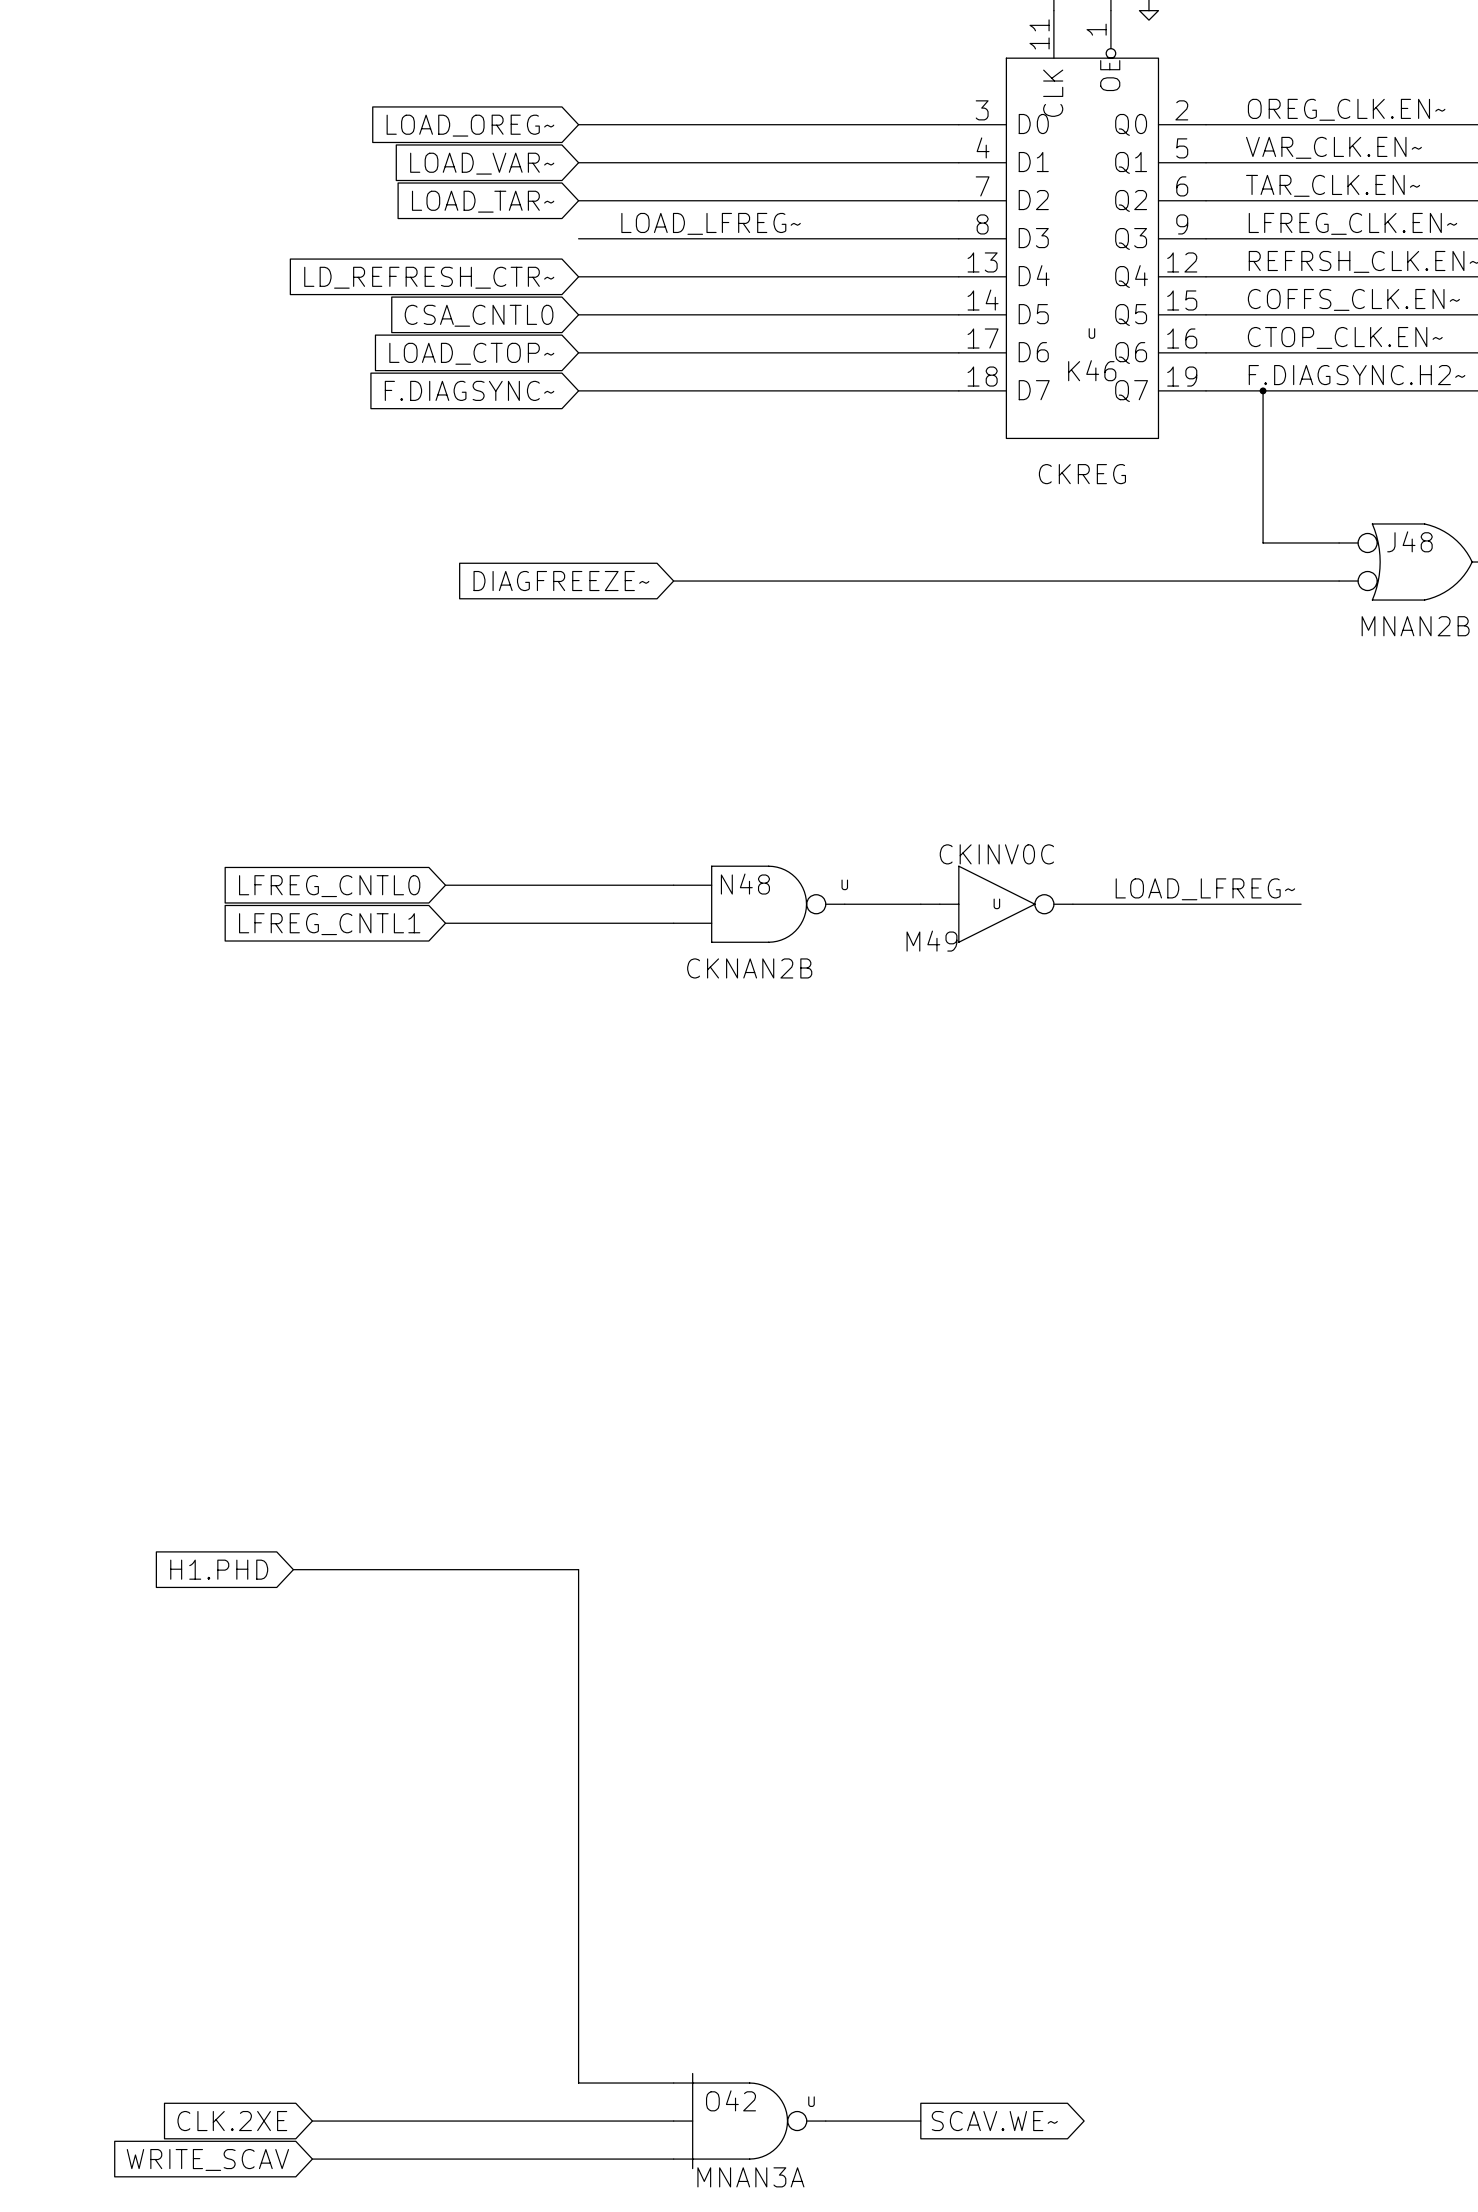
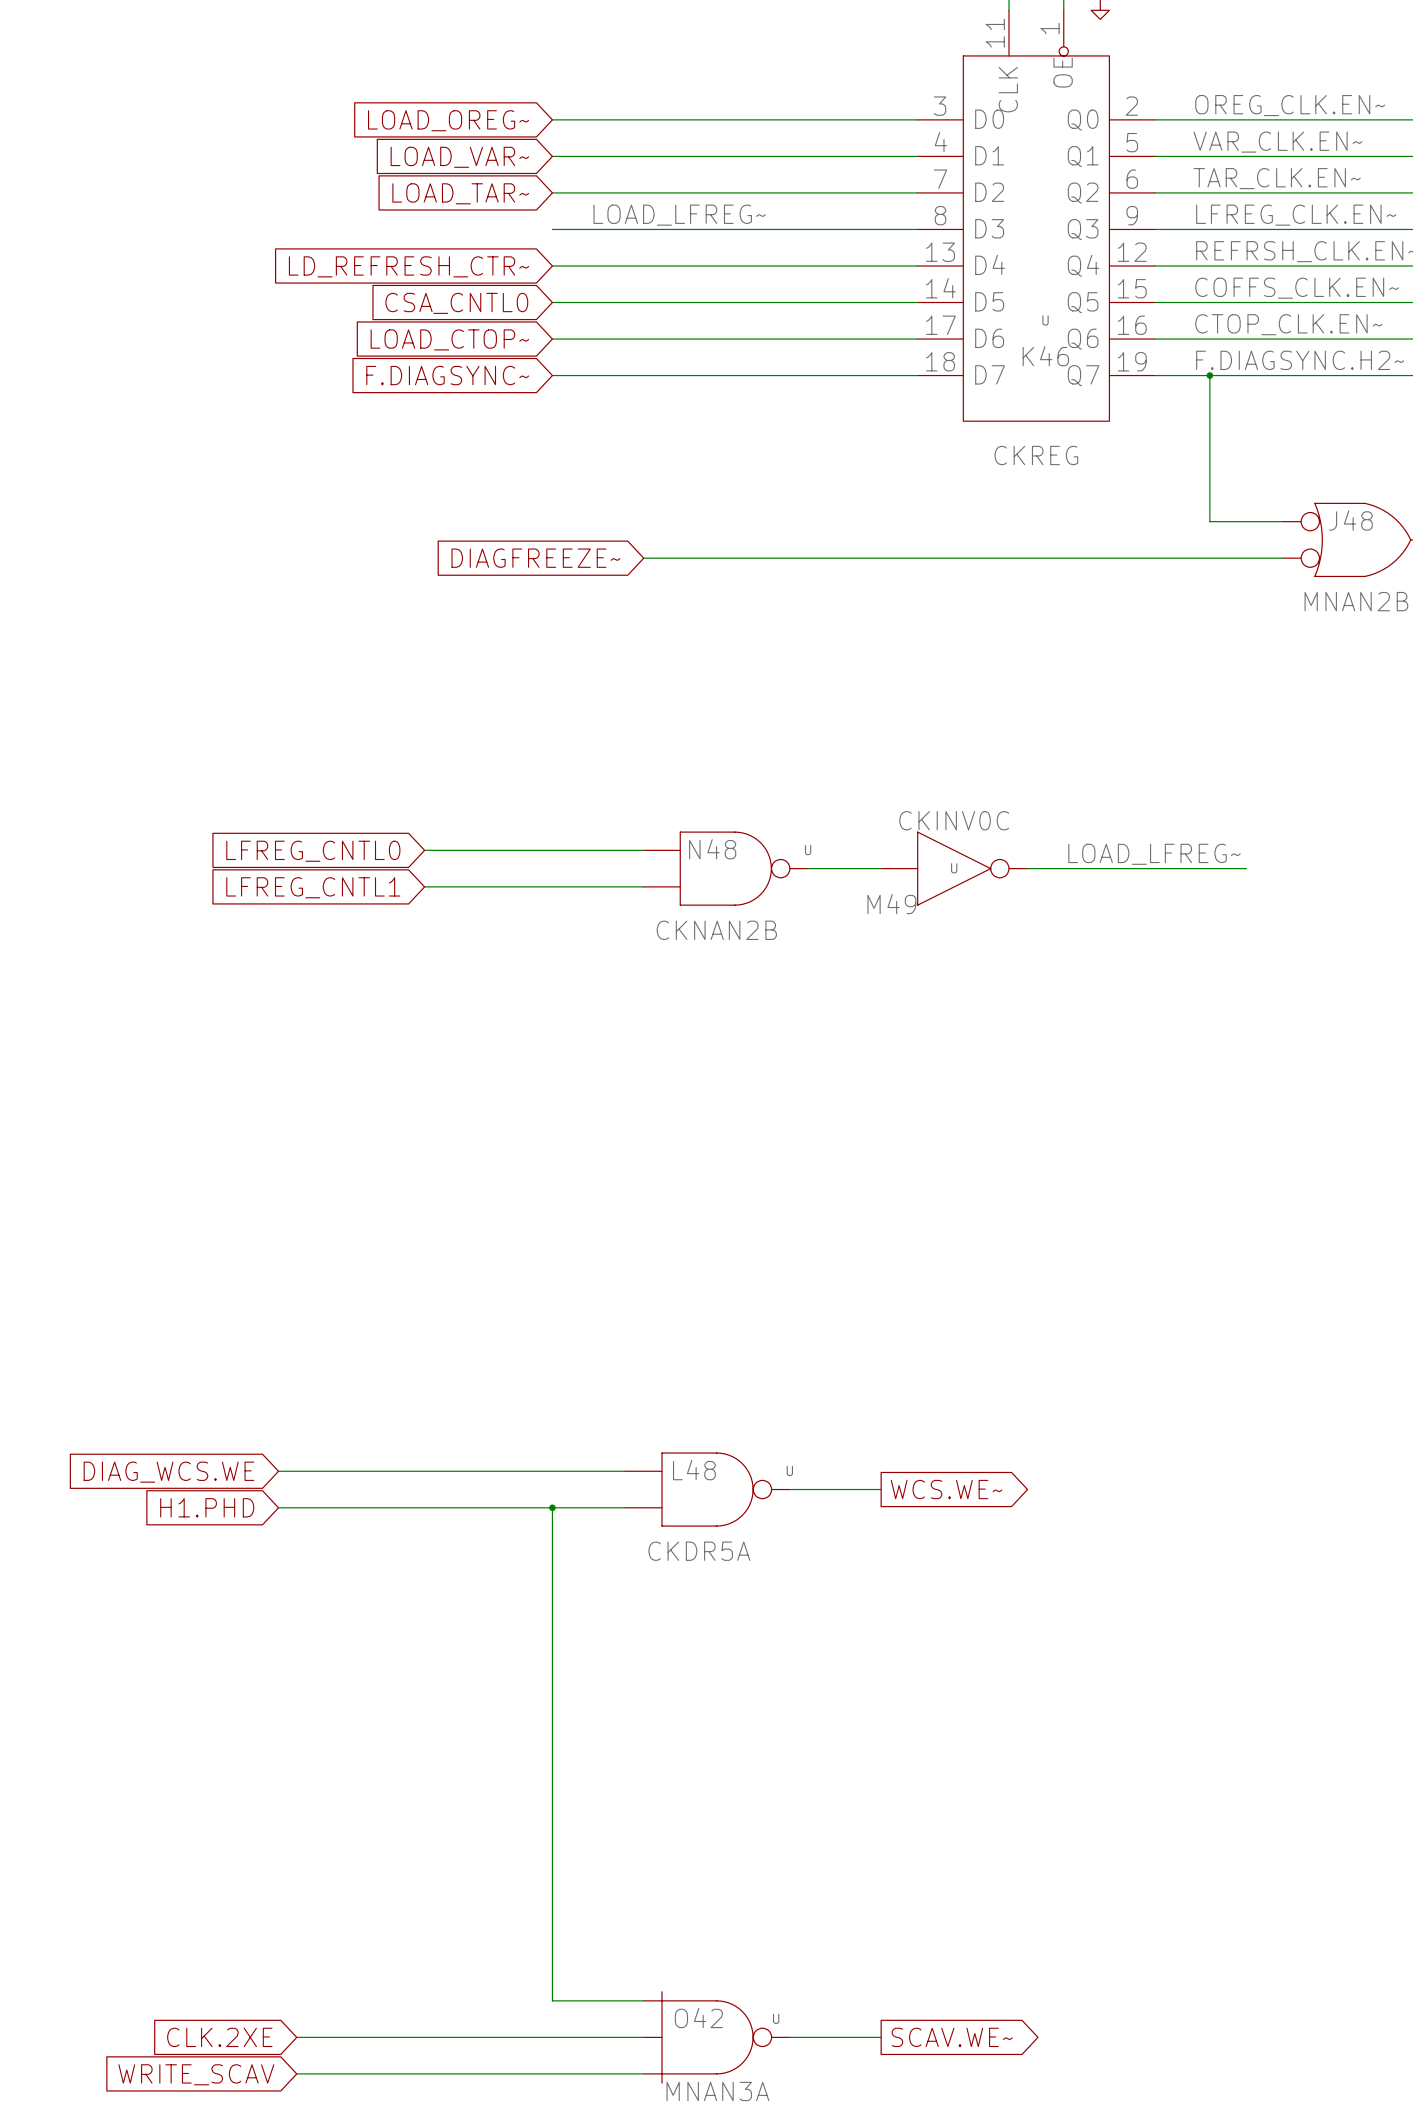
wire: none -> (278, 1471) (625, 1471)
global label: none -> DIAG_WCS.WE (168, 1472)
U: none -> (707, 1489)
wire: none -> (789, 1489) (881, 1489)
global label: none -> WCS.WE~ (946, 1489)
wire: none -> (552, 1507) (625, 1507)
junction: none -> (552, 1507)

